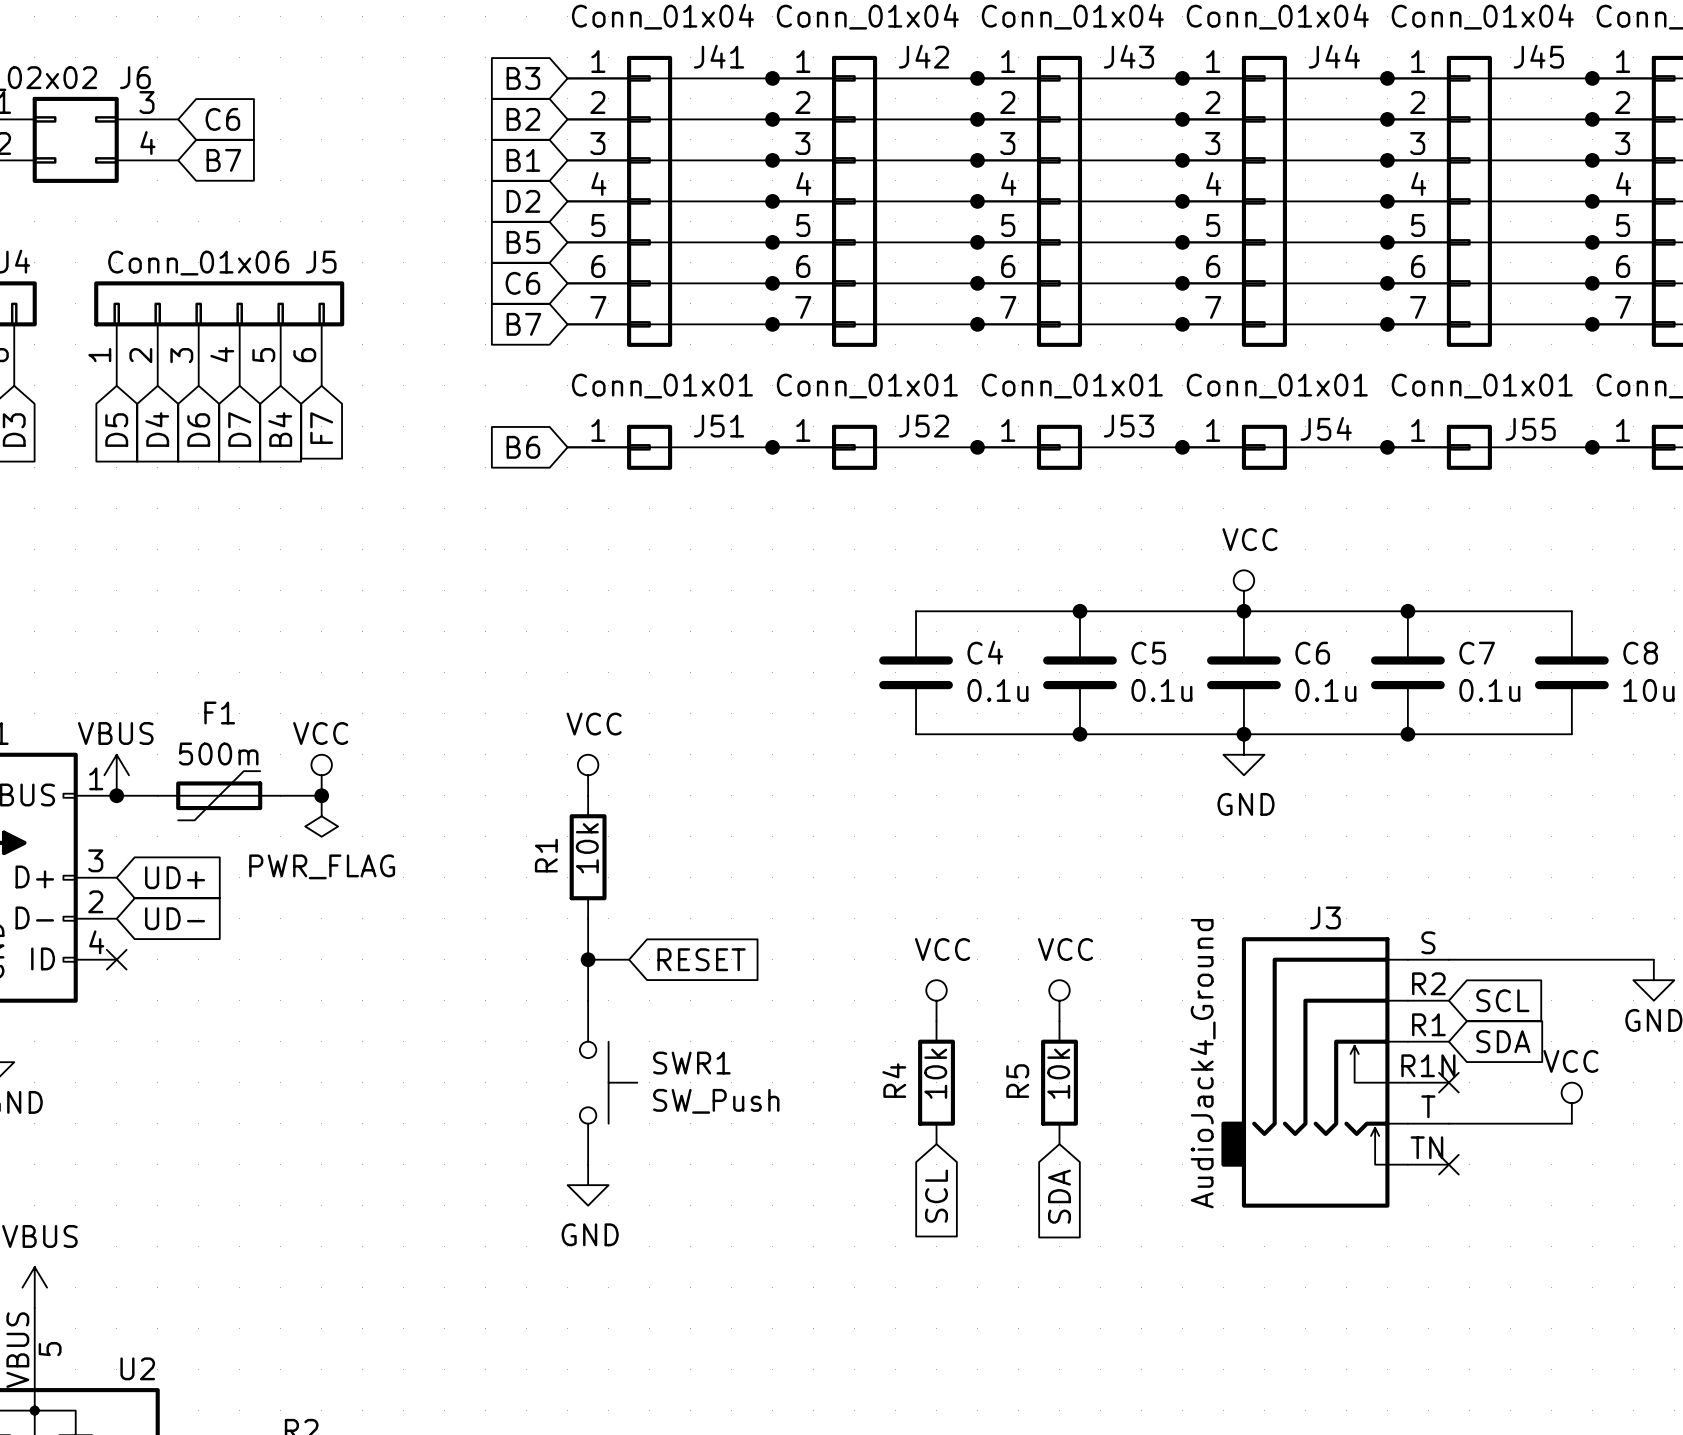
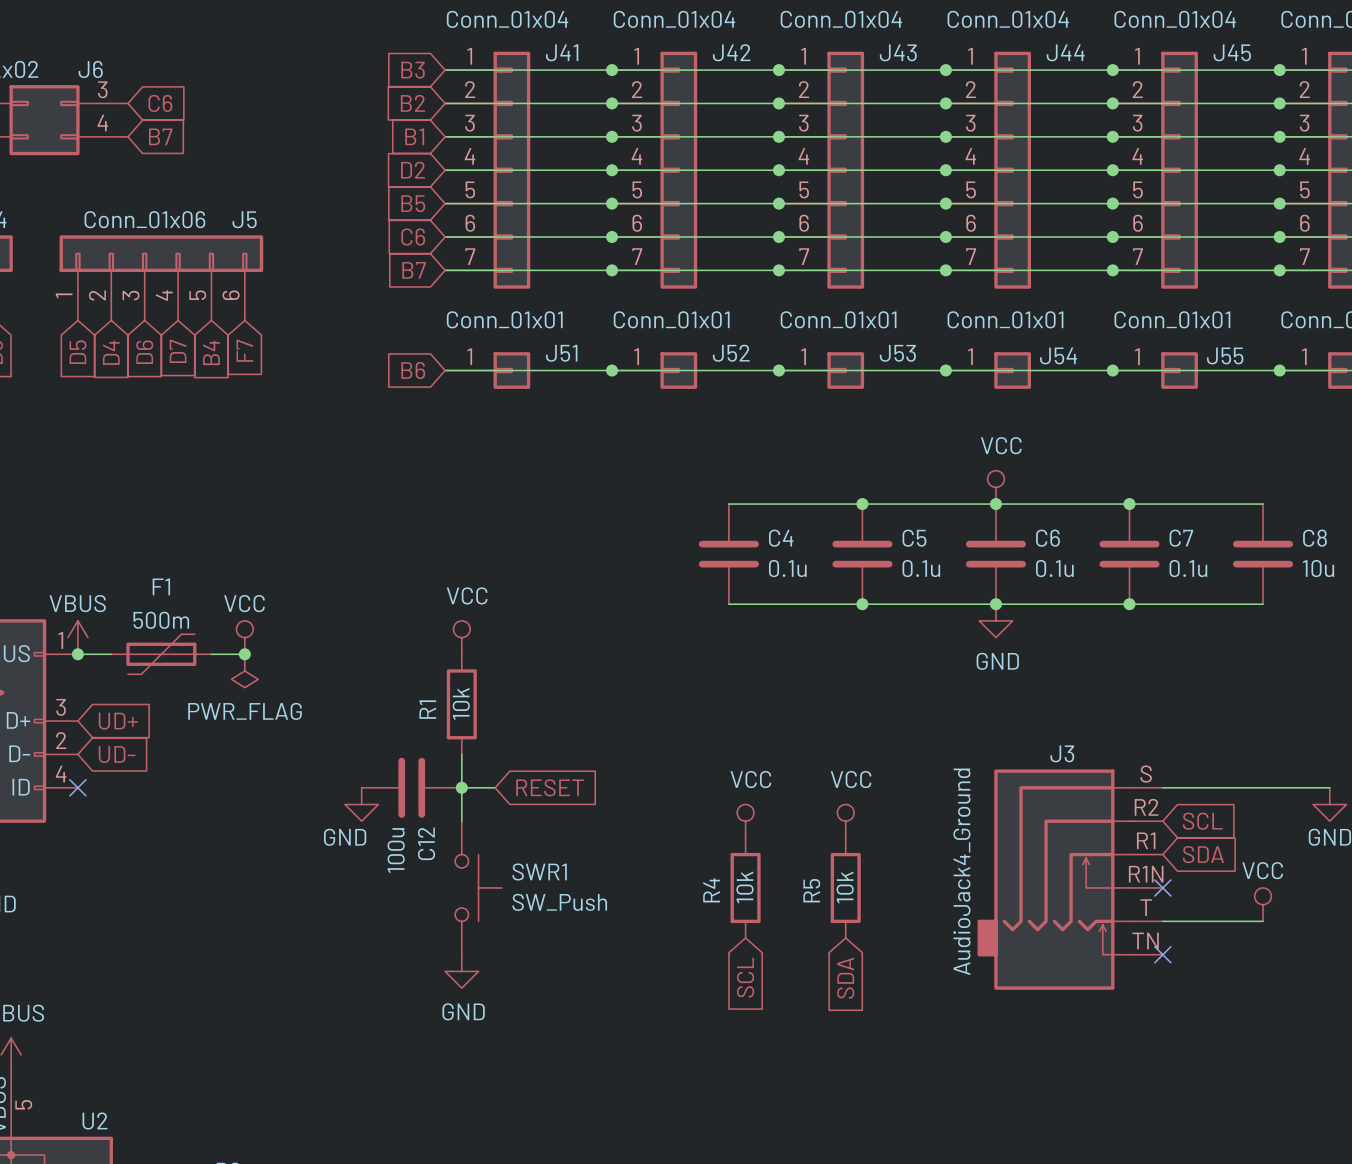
C12: none -> 100u (411, 787)
power symbol: none -> GND (361, 804)

